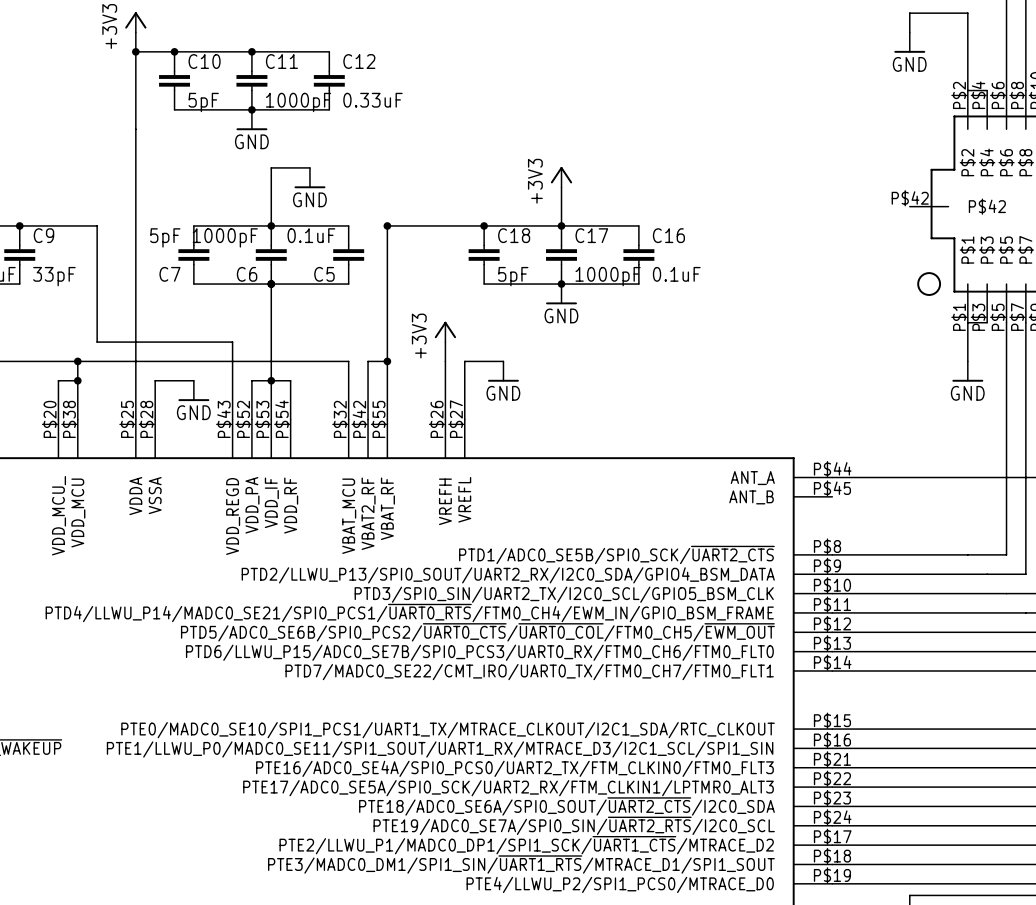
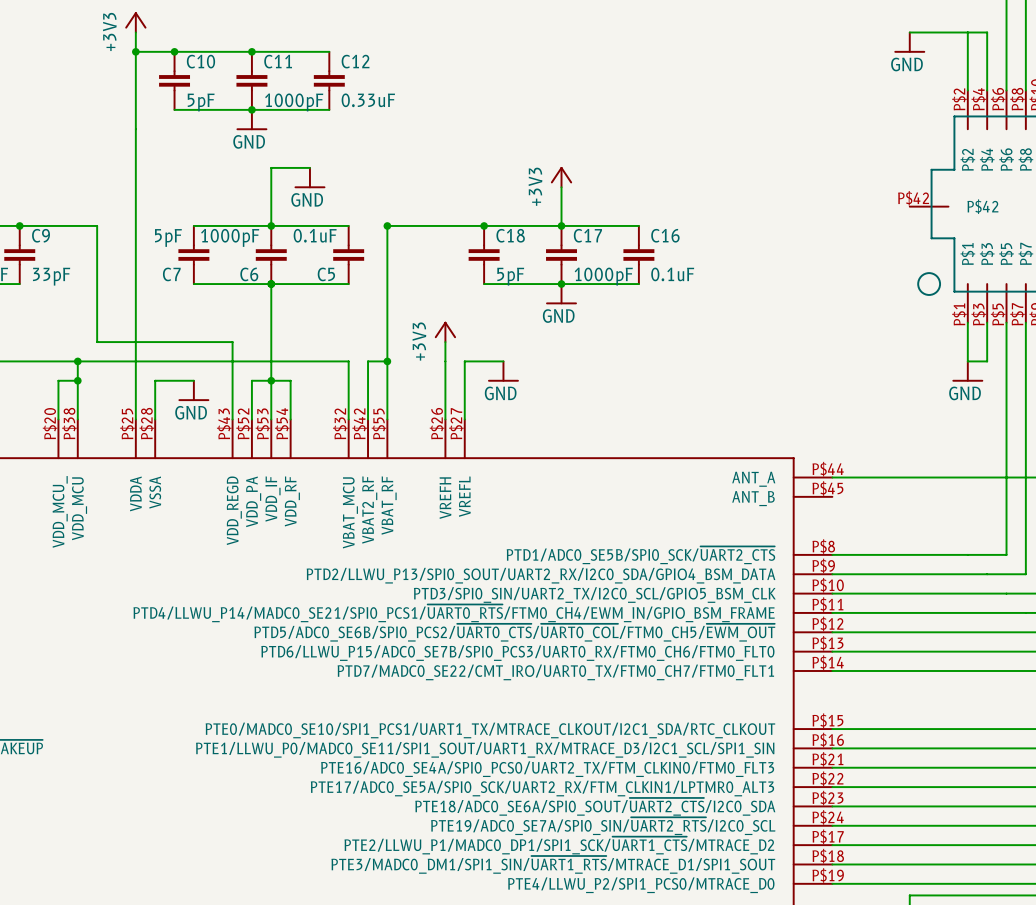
wire: (909, 32) (909, 13) (967, 13) (967, 32) -> (909, 32) (987, 32) (987, 90)
wire: (967, 90) (987, 90) -> none
wire: (967, 322) (987, 322) -> (967, 361) (987, 361) (987, 322)

